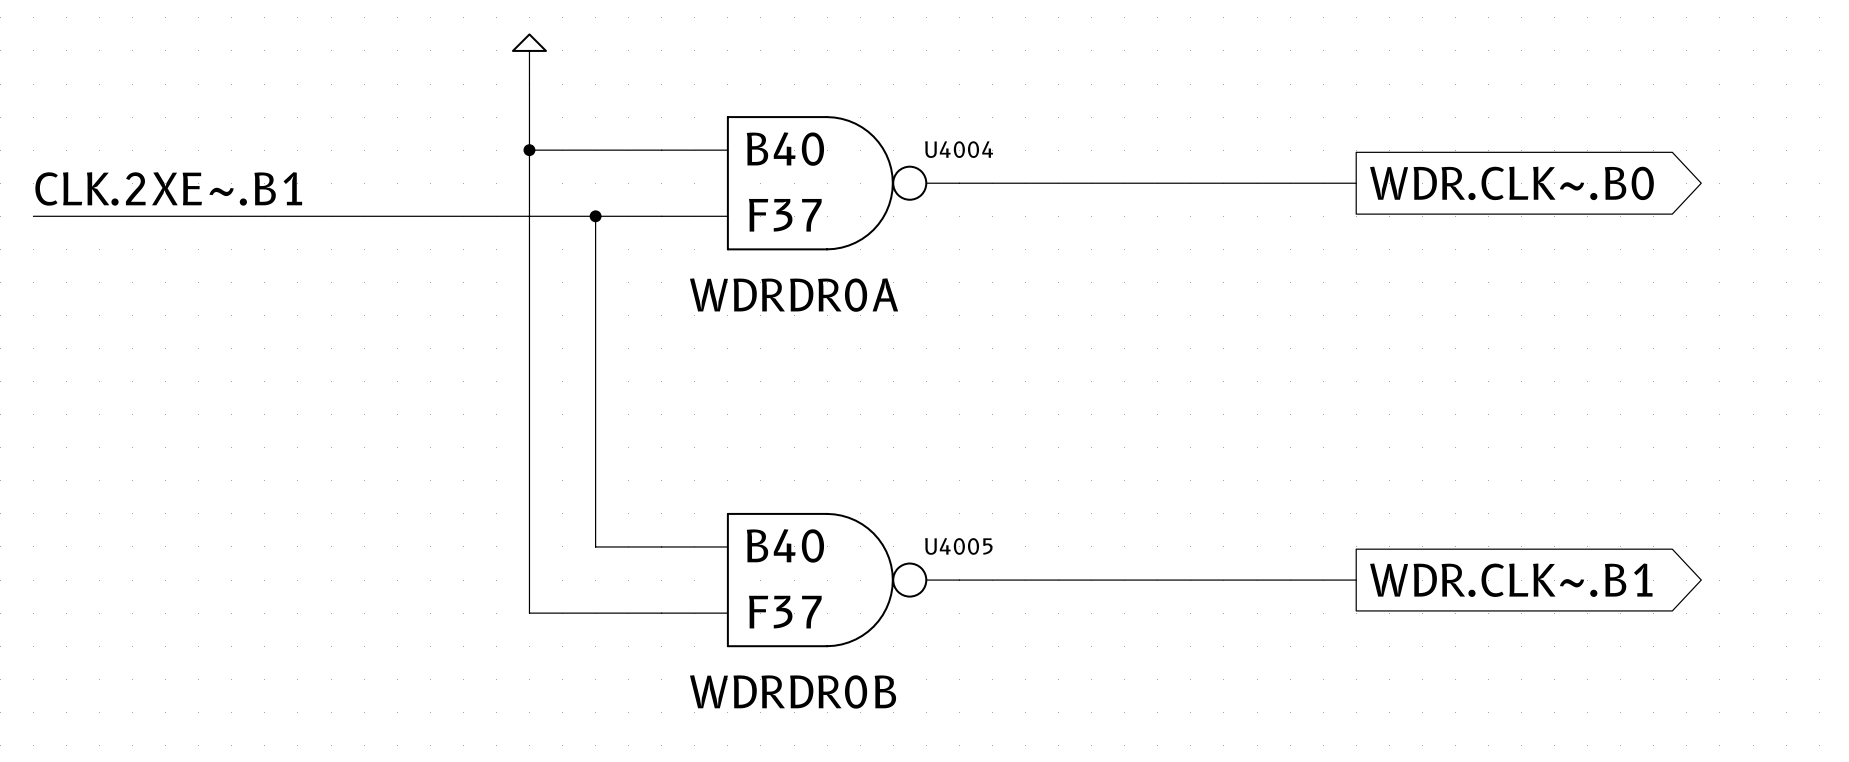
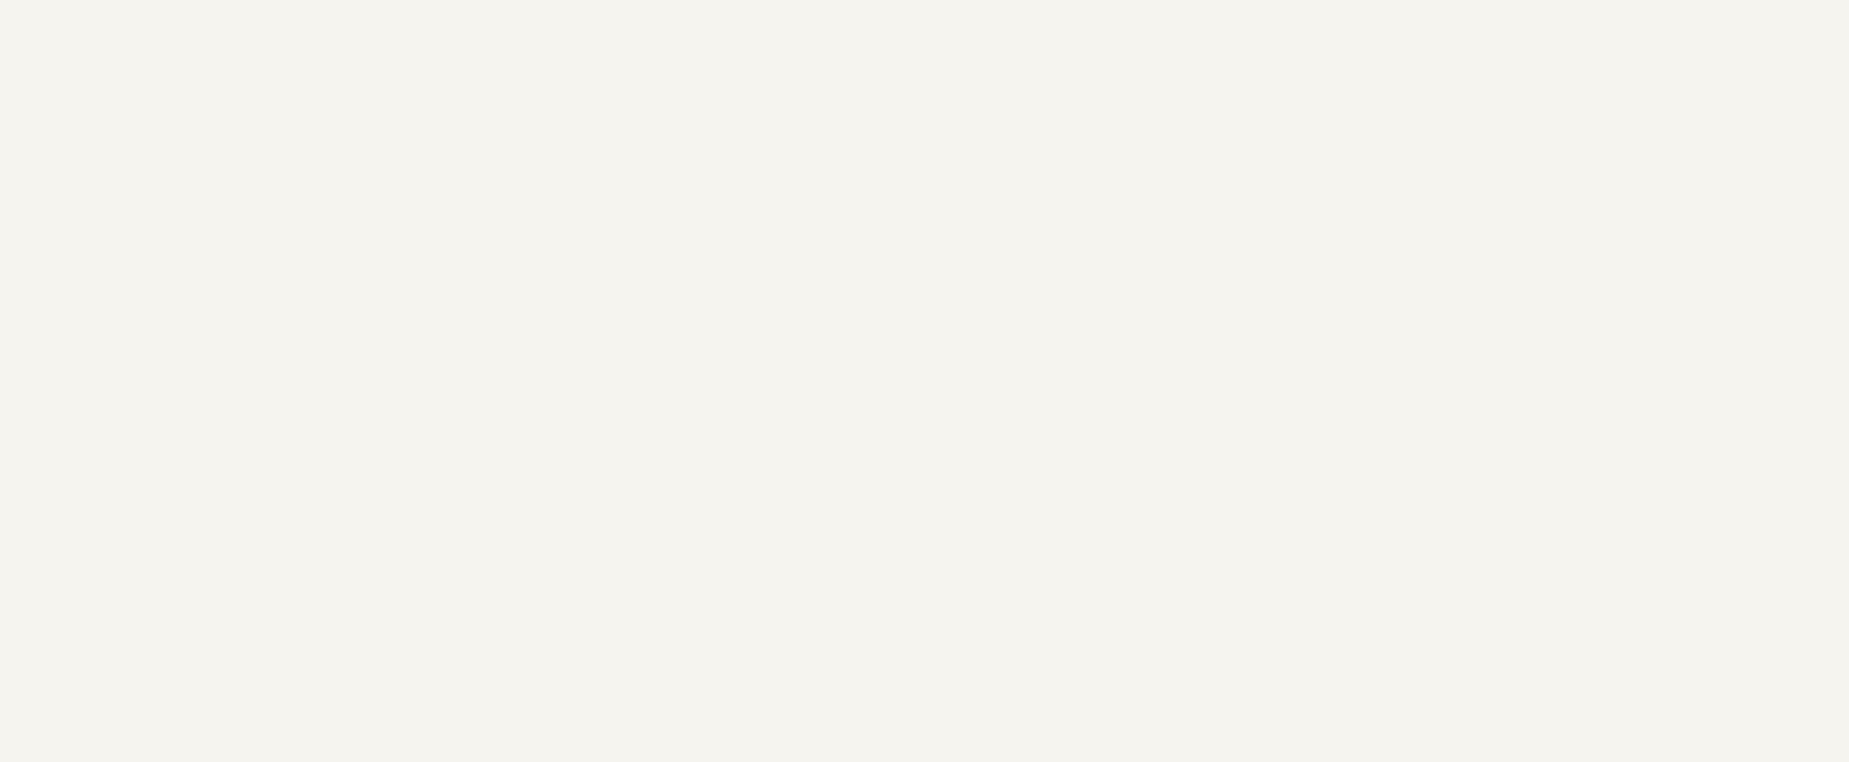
power symbol: (529, 58) -> none
wire: (529, 84) (529, 613) (661, 613) -> none
wire: (529, 150) (661, 150) -> none
junction: (529, 150) -> none
U4004: F37 (810, 183) -> none
wire: (959, 183) (1356, 183) -> none
global label: WDR.CLK~.B0 (1511, 183) -> none
label: CLK.2XE~.B1 (168, 188) -> none
wire: (33, 216) (661, 216) -> none
wire: (595, 216) (595, 546) (661, 546) -> none
junction: (595, 216) -> none
U4005: F37 (810, 580) -> none
wire: (959, 580) (1356, 580) -> none
global label: WDR.CLK~.B1 (1511, 580) -> none

